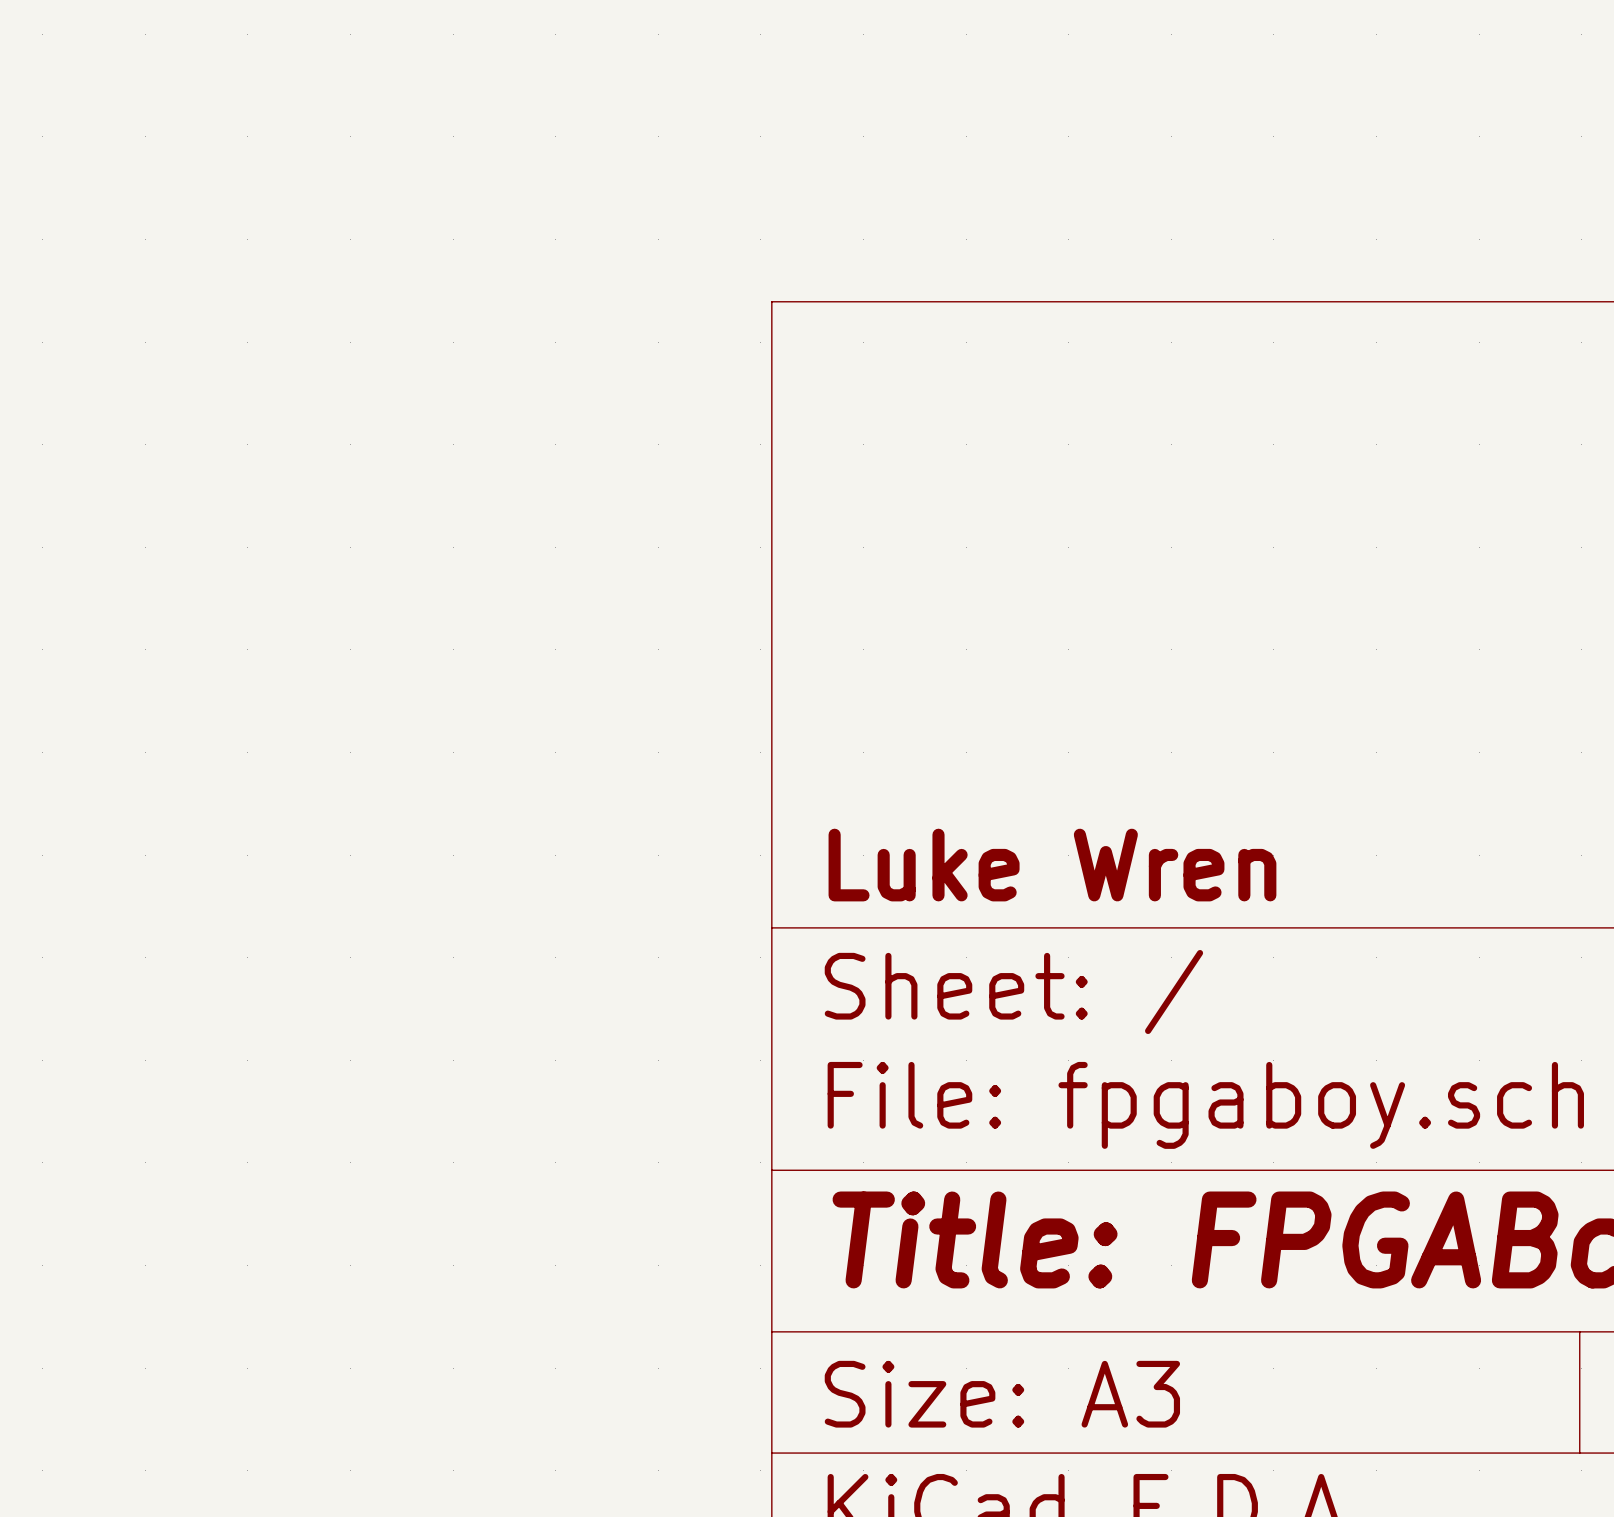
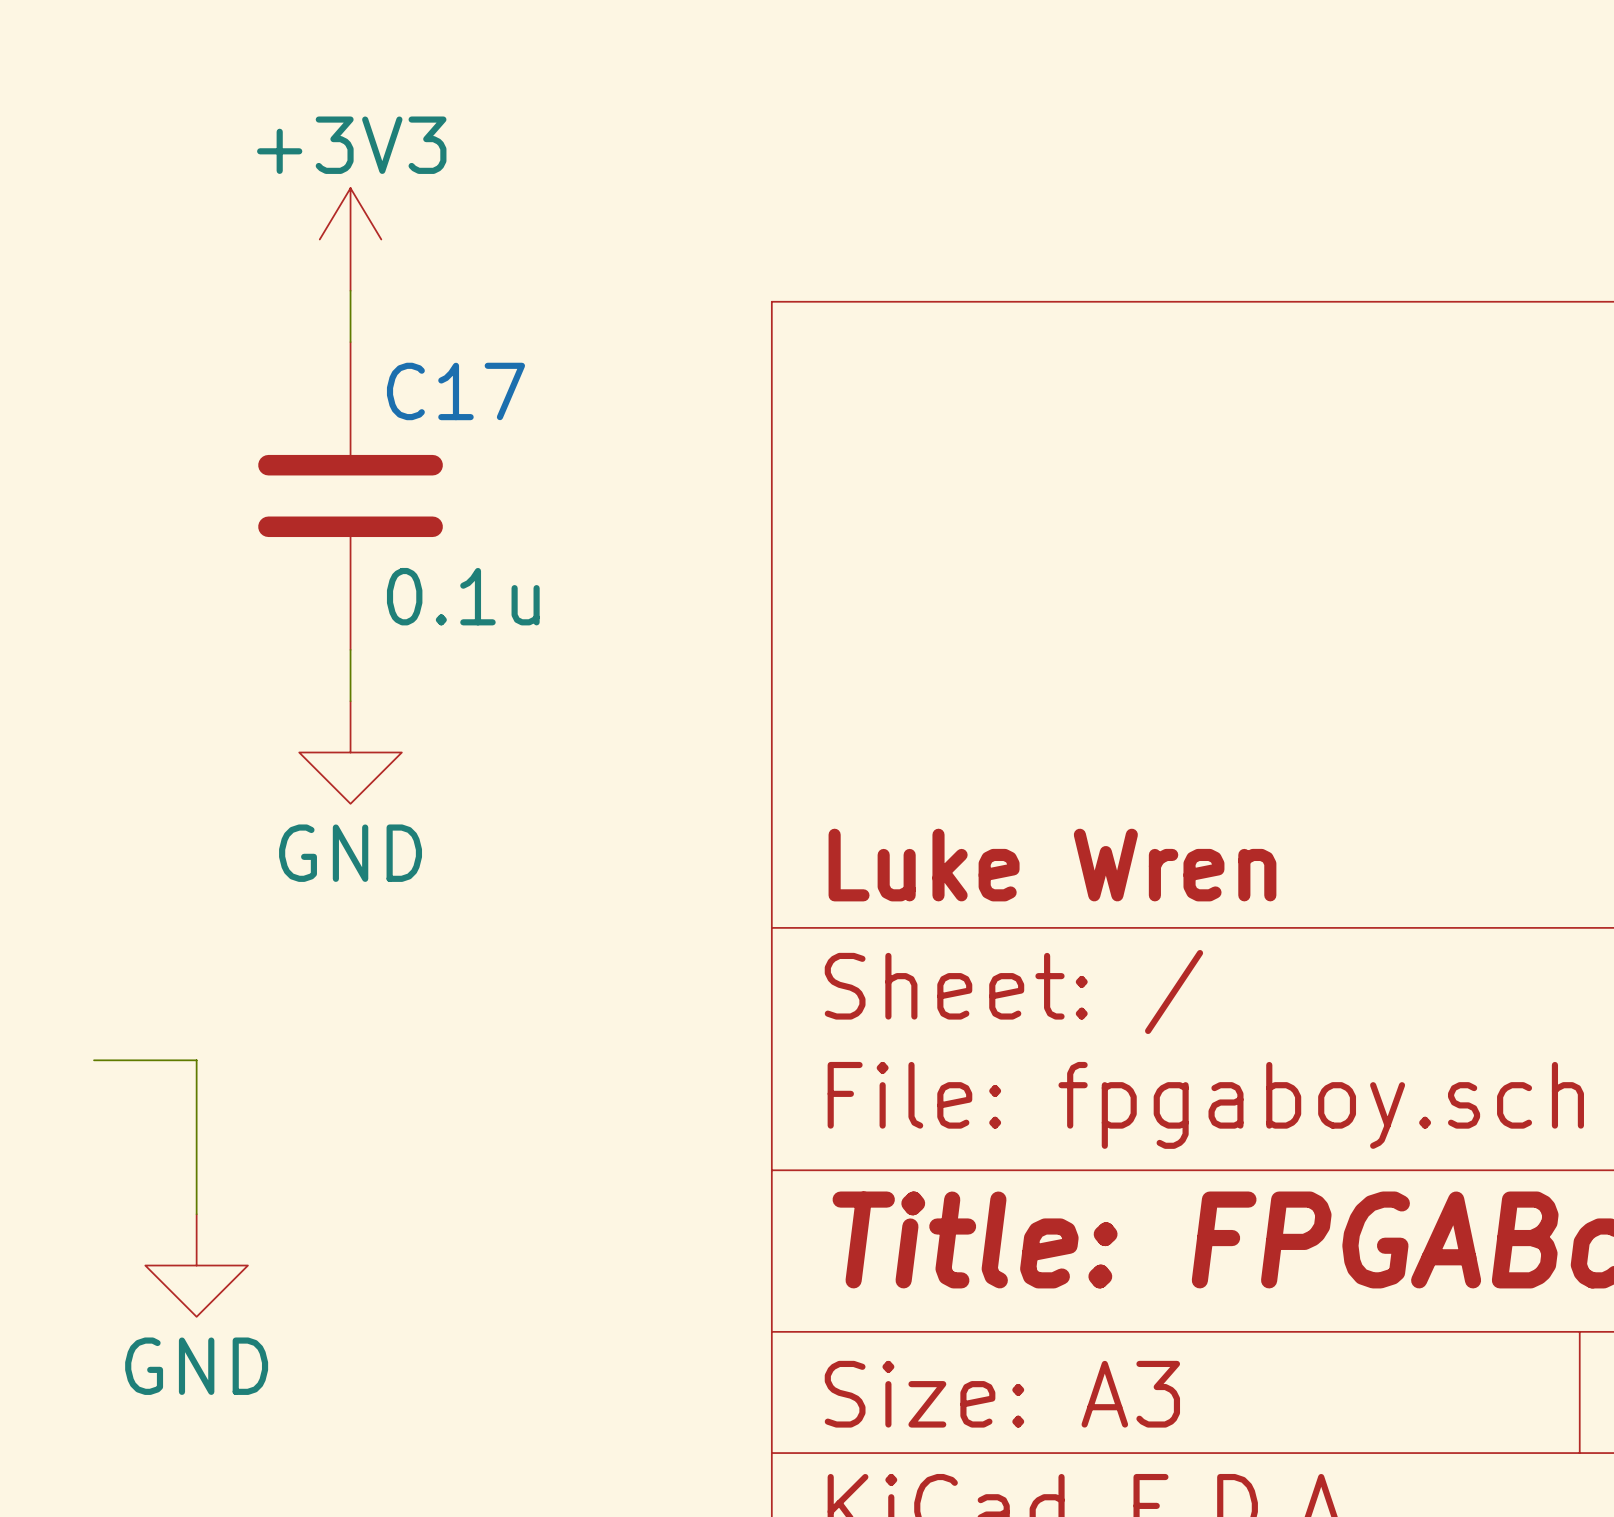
power symbol: none -> +3V3 (350, 239)
wire: none -> (350, 290) (350, 342)
C17: none -> 0.1u (350, 495)
wire: none -> (350, 649) (350, 701)
power symbol: none -> GND (350, 752)
wire: none -> (94, 1060) (196, 1060) (196, 1214)
power symbol: none -> GND (196, 1265)

